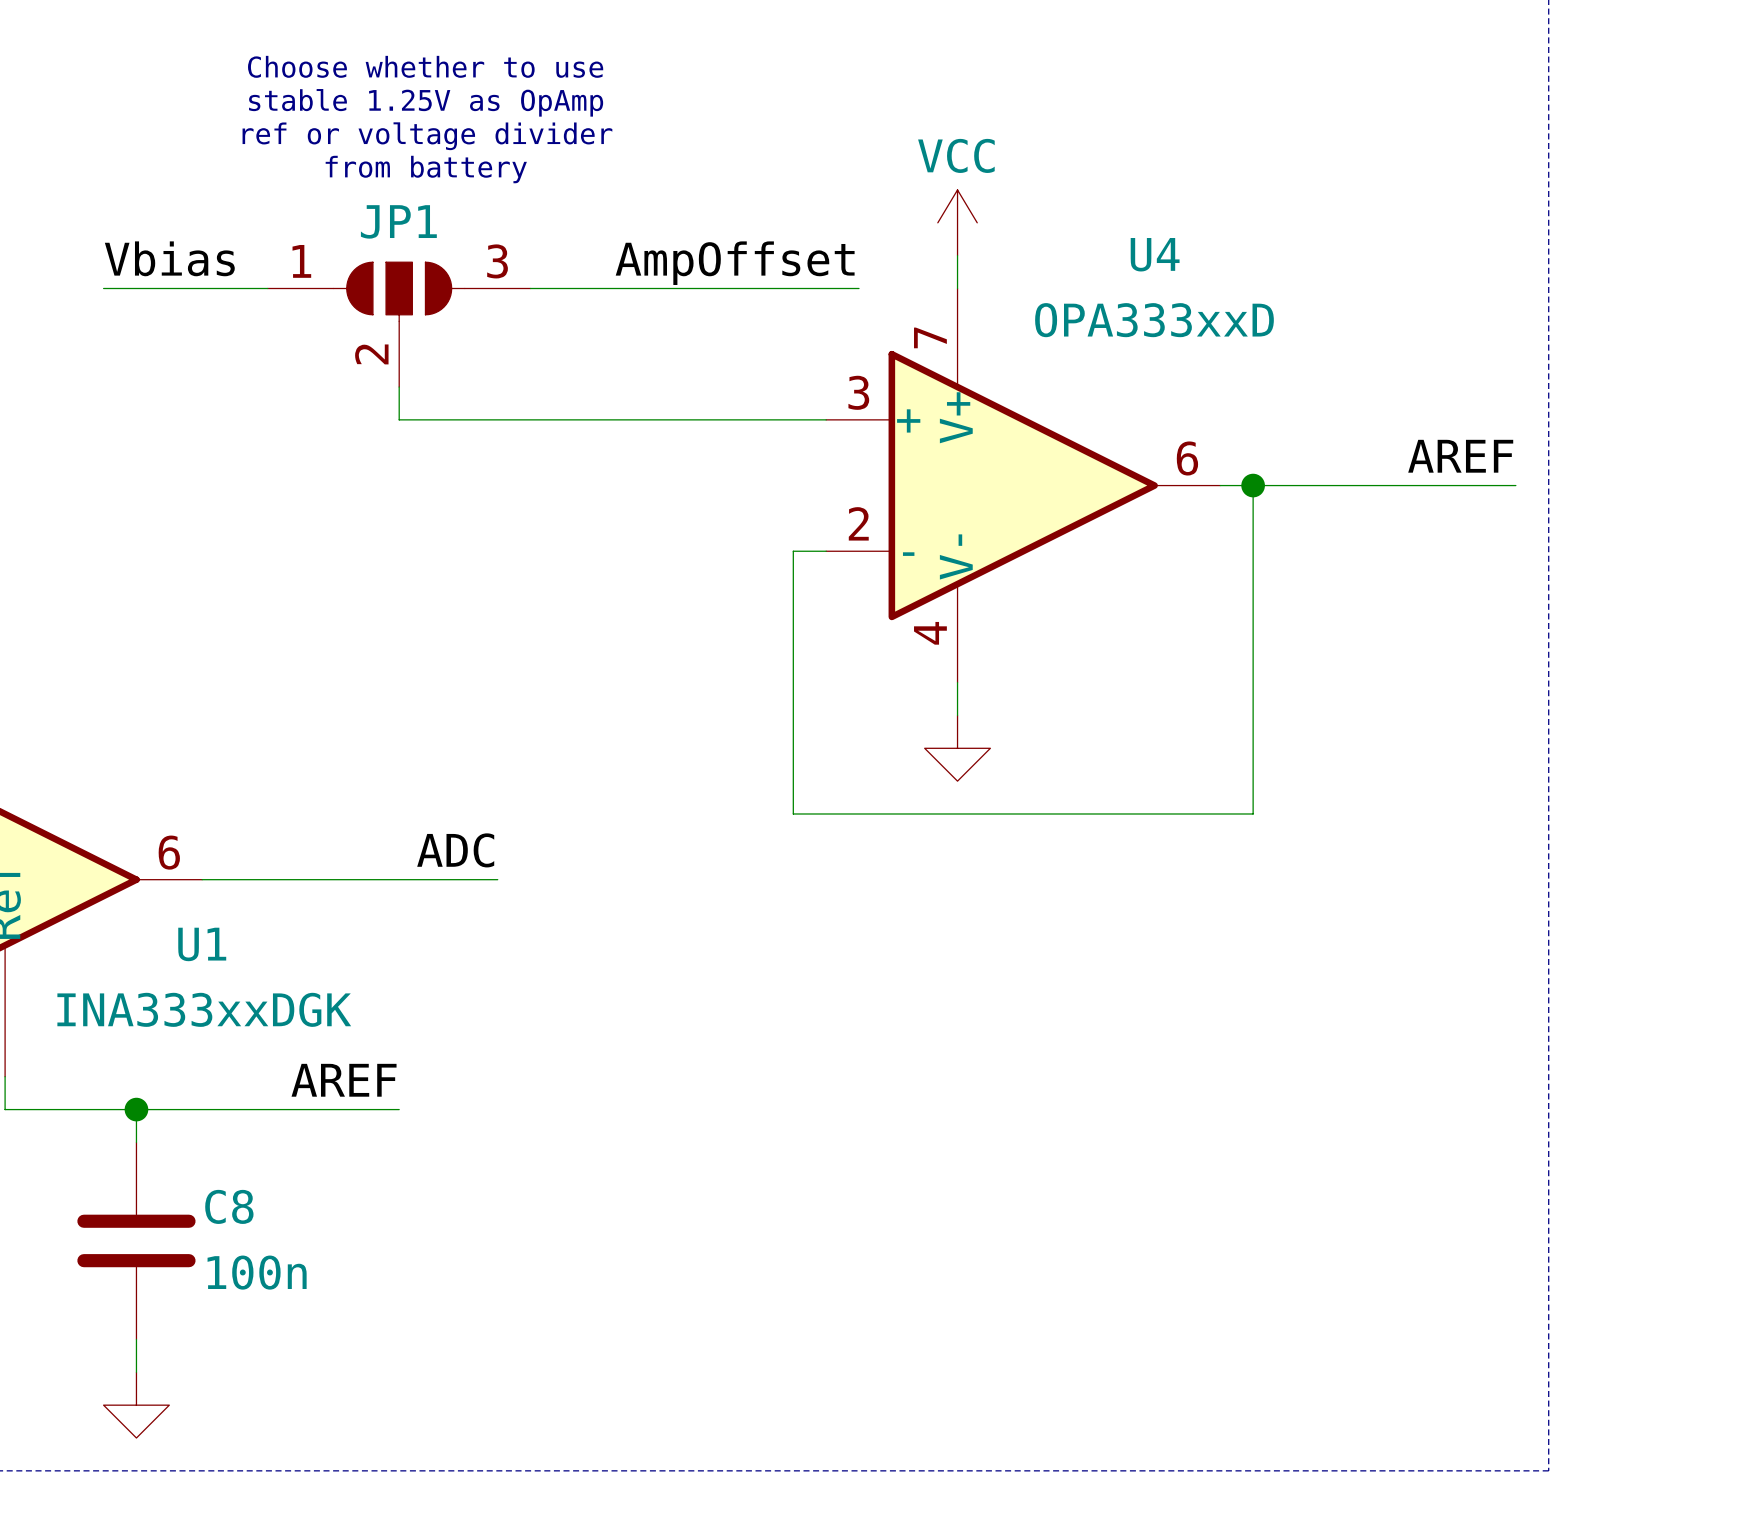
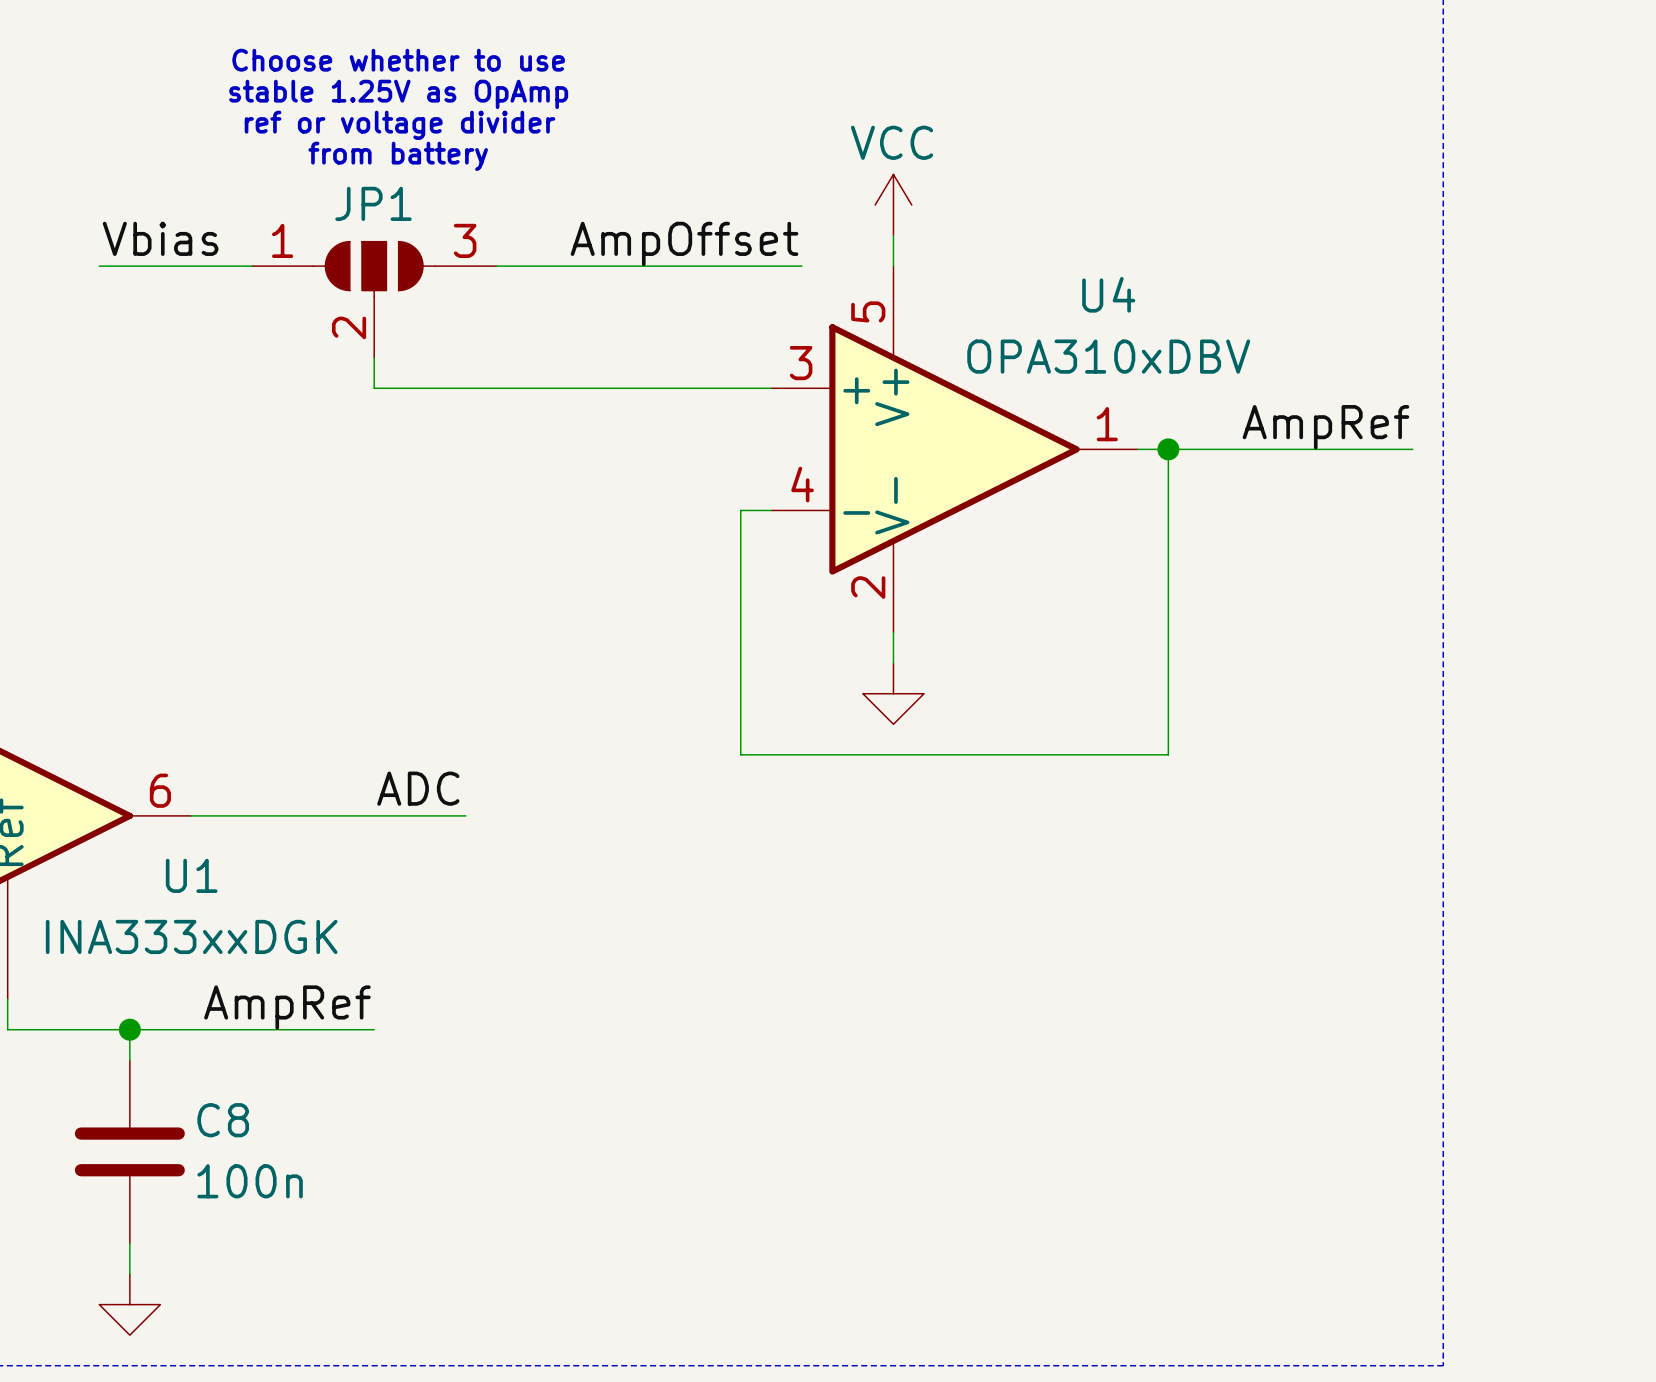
U4 name position: U4 (1155, 254) -> U4 (1108, 294)
U4 value: OPA333xxD (1154, 320) -> OPA310xDBV (1108, 356)
U4 pin number: 7 (930, 337) -> 5 (868, 311)
label: AREF (1460, 456) -> AmpRef (1325, 427)
U4 pin number: 6 (1187, 458) -> 1 (1107, 424)
U4 pin number: 2 (858, 523) -> 4 (802, 484)
U4 pin number: 4 (930, 633) -> 2 (868, 587)
label: AREF (344, 1080) -> AmpRef (287, 1007)

